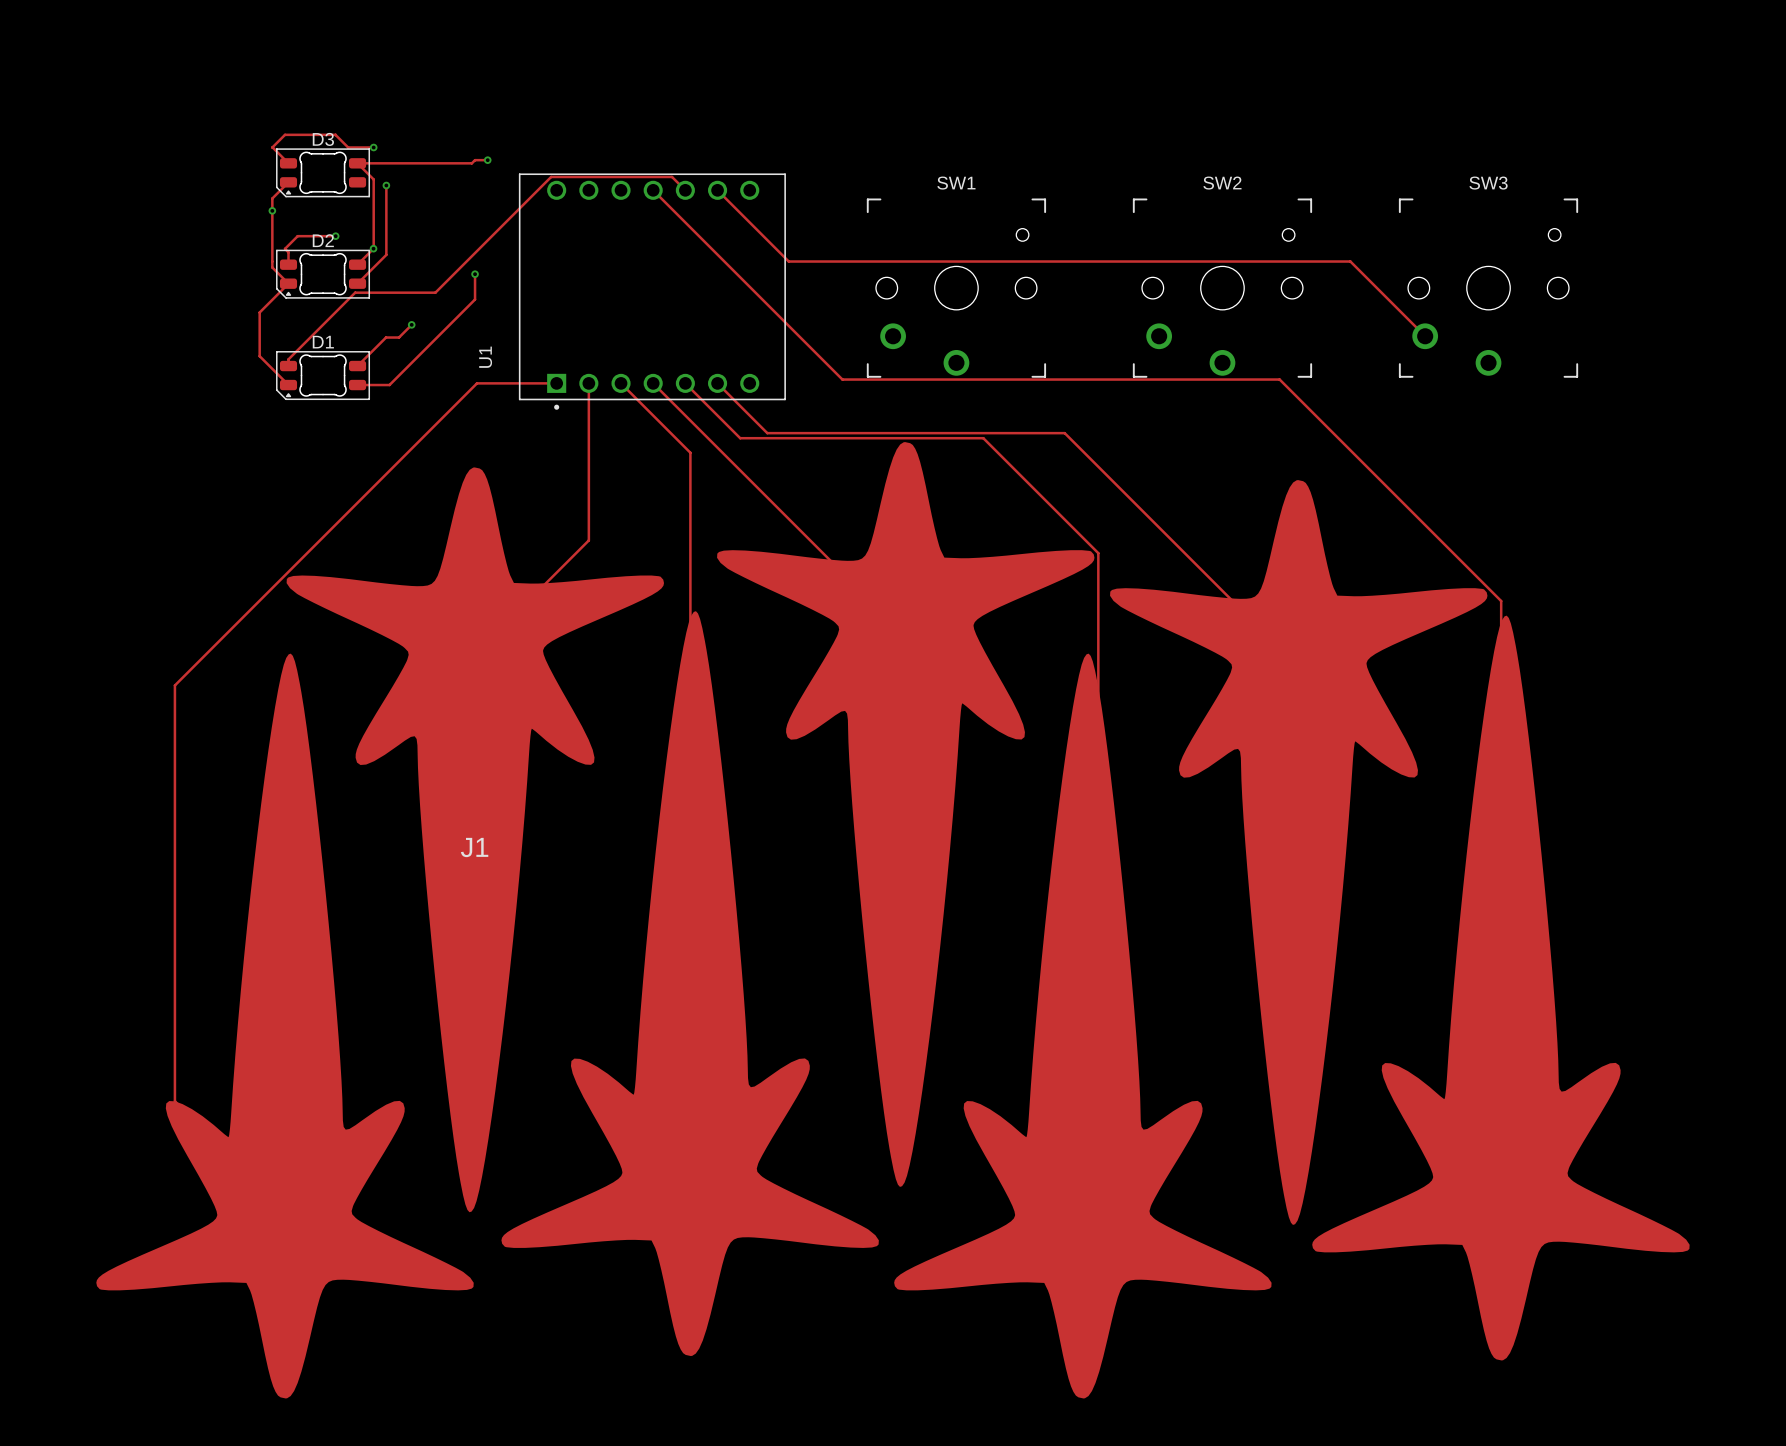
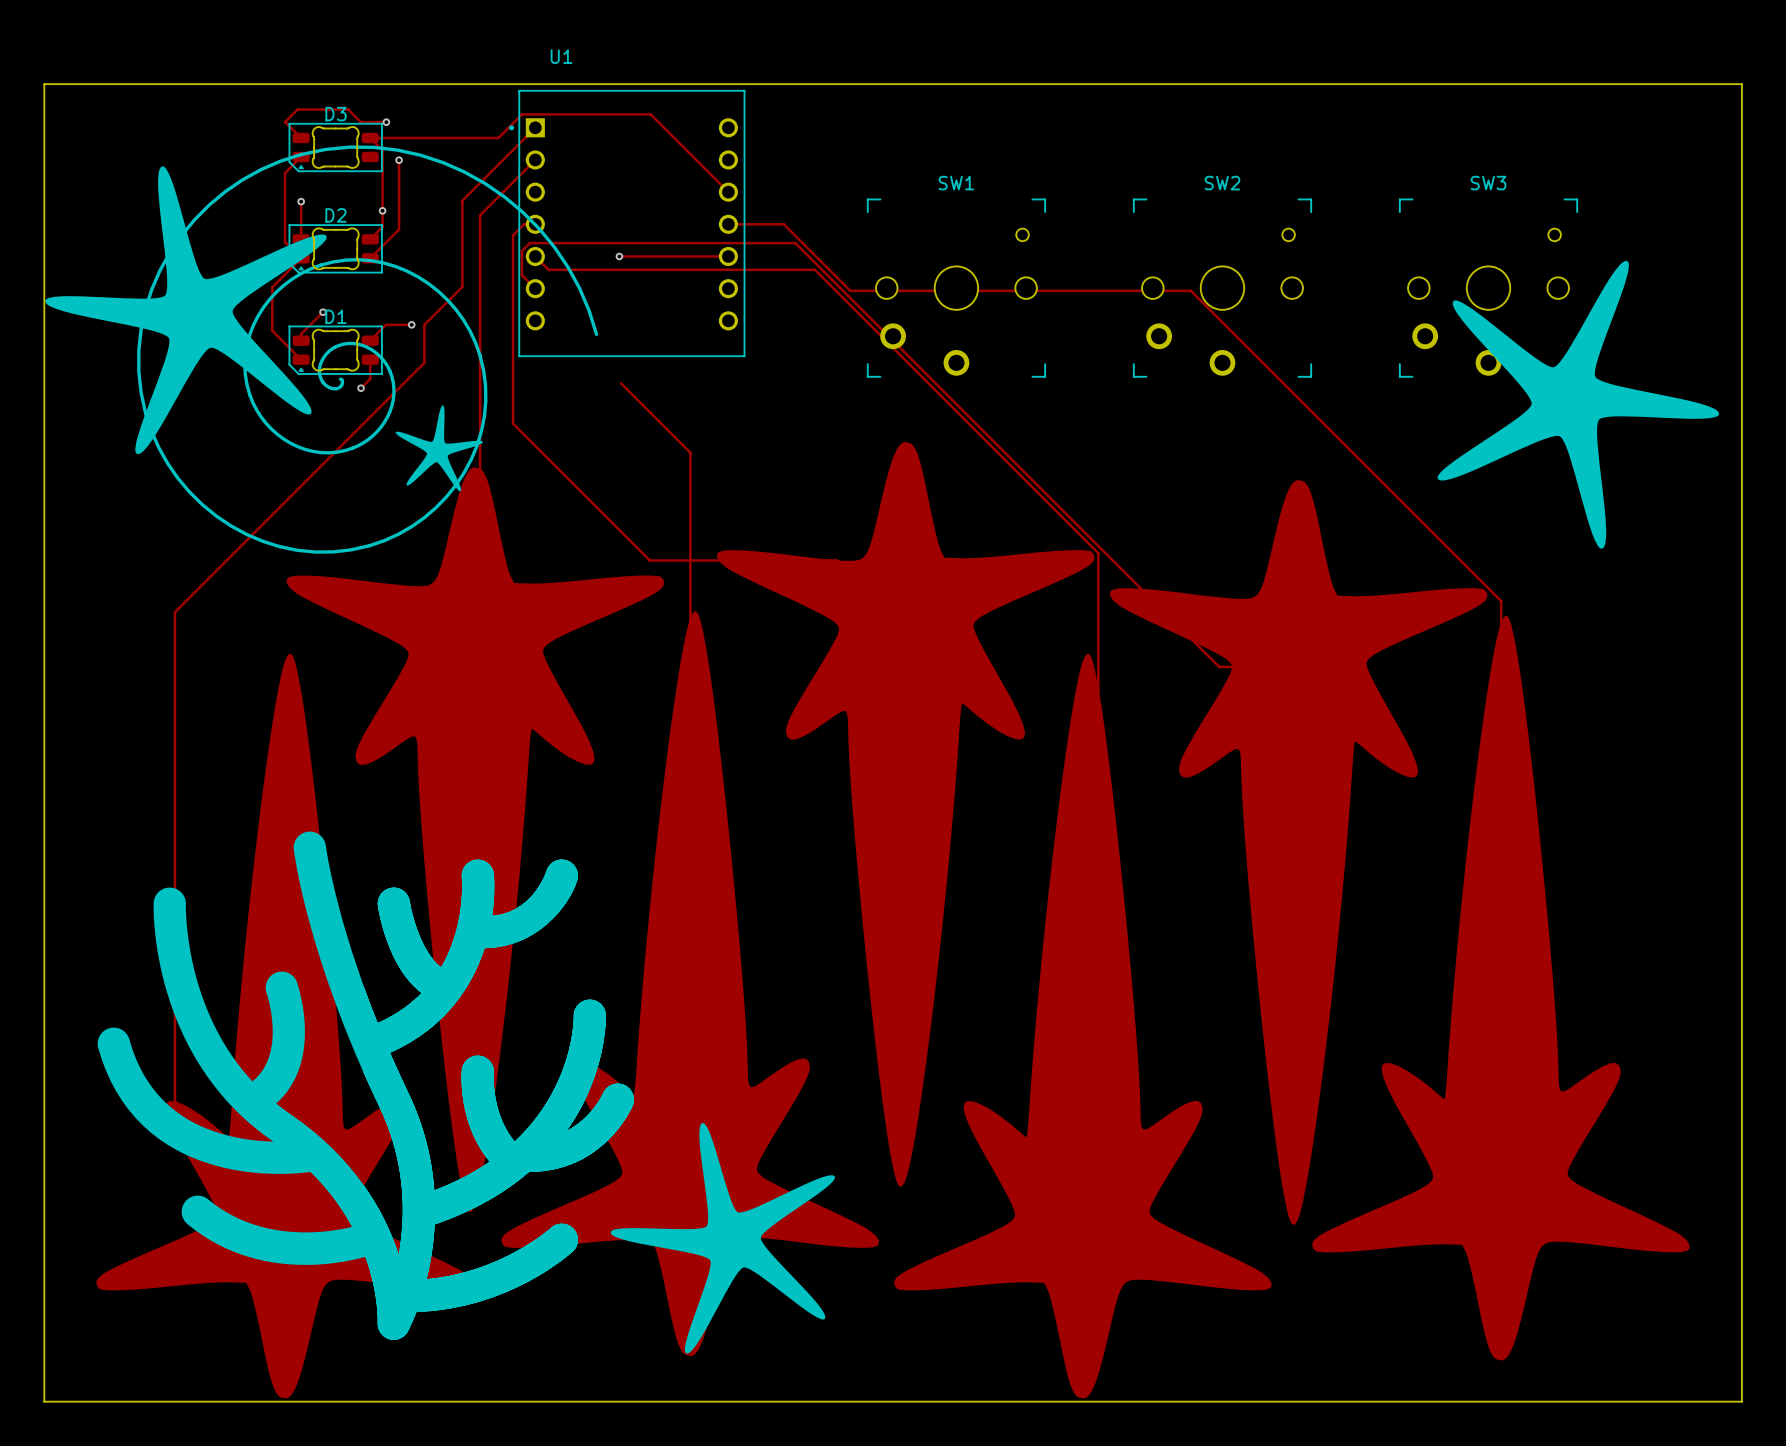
board edge: none -> (44, 84) (1741, 84) (1741, 1401) (44, 1401) (44, 84)
via: none -> (386, 122)
track: (335, 134) (285, 134) (272, 147) (288, 163) -> (348, 109) (297, 109) (285, 122) (301, 138)
track: (335, 135) (348, 147) (373, 147) -> (348, 109) (360, 122) (386, 122)
via: (373, 147) -> none
via: none -> (399, 160)
track: (487, 160) (475, 160) (471, 163) (357, 163) (373, 179) (373, 248) (357, 264) -> none
via: (487, 160) -> none
drawing: none -> [45, 166, 327, 455]
D3 position: (323, 172) -> (335, 147)
track: (288, 182) (272, 198) (272, 267) (288, 283) (259, 312) (259, 356) (288, 385) -> (301, 157) (285, 173) (285, 242) (301, 258) (272, 287) (272, 330) (301, 359)
track: (386, 185) (386, 254) (357, 283) (353, 282) (353, 284) -> (399, 160) (399, 229) (370, 258) (366, 257) (366, 259)
via: (386, 185) -> none
track: (653, 190) (842, 379) (1279, 379) -> (728, 224) (783, 224) (850, 290) (1190, 290) (1279, 379)
track: (685, 190) (672, 176) (551, 176) (435, 292) (355, 292) (288, 359) (288, 366) -> none
track: (717, 190) (788, 261) (1350, 261) (1425, 336) -> none
track: none -> (728, 192) (650, 114) (521, 114) (498, 138) (370, 138) (382, 150) (382, 226) (370, 239)
track: none -> (301, 201) (301, 239)
via: none -> (301, 201)
via: (272, 210) -> none
via: none -> (382, 210)
track: (335, 236) (297, 236) (285, 248) (288, 252) (288, 264) -> none
via: (335, 236) -> none
via: (373, 248) -> none
track: none -> (619, 256) (728, 256)
via: none -> (619, 256)
drawing: none -> [1437, 260, 1720, 549]
D2 position: (323, 274) -> (335, 248)
track: (475, 274) (475, 299) (389, 385) (357, 385) -> none
via: (475, 274) -> none
U1 rotation: 0° (652, 291) -> 90° clockwise (627, 223)
track: none -> (323, 312) (301, 334) (301, 340)
via: none -> (323, 312)
track: (411, 324) (399, 337) (386, 337) (357, 366) -> (411, 324) (386, 324) (370, 340)
line: none -> (596, 334) (579, 288) (554, 247) (522, 212) (485, 183) (442, 162) (397, 150) (349, 147) (325, 149) (301, 154) (261, 169) (225, 191) (194, 219) (169, 252) (151, 289) (141, 329) (138, 371) (141, 392) (151, 431) (167, 463) (189, 492) (216, 515) (246, 534) (279, 546) (315, 552) (351, 549) (369, 545) (398, 534) (424, 517) (446, 496) (464, 472) (477, 445) (484, 416) (485, 385) (483, 370) (475, 342) (463, 320) (447, 300) (428, 283) (407, 271) (383, 262) (346, 260) (320, 265) (301, 273) (284, 285) (269, 299) (258, 316) (249, 334) (244, 364) (249, 395) (256, 410) (265, 423) (290, 443) (312, 451) (336, 452) (363, 442) (381, 426) (390, 411) (393, 394) (391, 376) (383, 359) (370, 349) (359, 344) (347, 343) (334, 347) (322, 360) (319, 375) (324, 384) (333, 388) (341, 385) (342, 380) (340, 379)
track: none -> (370, 359) (370, 379) (361, 388)
D1 position: (323, 375) -> (335, 350)
track: (556, 383) (476, 383) (174, 685) -> (535, 127) (462, 200) (462, 286) (424, 324) (424, 362) (174, 612) (174, 685)
track: (588, 383) (588, 540) (480, 649) -> (535, 159) (480, 215) (480, 649)
track: (653, 383) (898, 628) (905, 628) -> (535, 224) (524, 224) (513, 235) (513, 423) (649, 560) (837, 560) (905, 628)
track: (685, 383) (740, 438) (983, 438) -> (535, 256) (548, 269) (814, 269) (983, 438)
track: (717, 383) (767, 433) (1064, 433) (1298, 666) -> (535, 288) (521, 275) (521, 250) (529, 243) (795, 243) (1219, 666) (1298, 666)
via: none -> (361, 388)
drawing: none -> [395, 405, 483, 492]
drawing: none -> [97, 831, 836, 1354]
J1 name: J1 (474, 847) -> none

